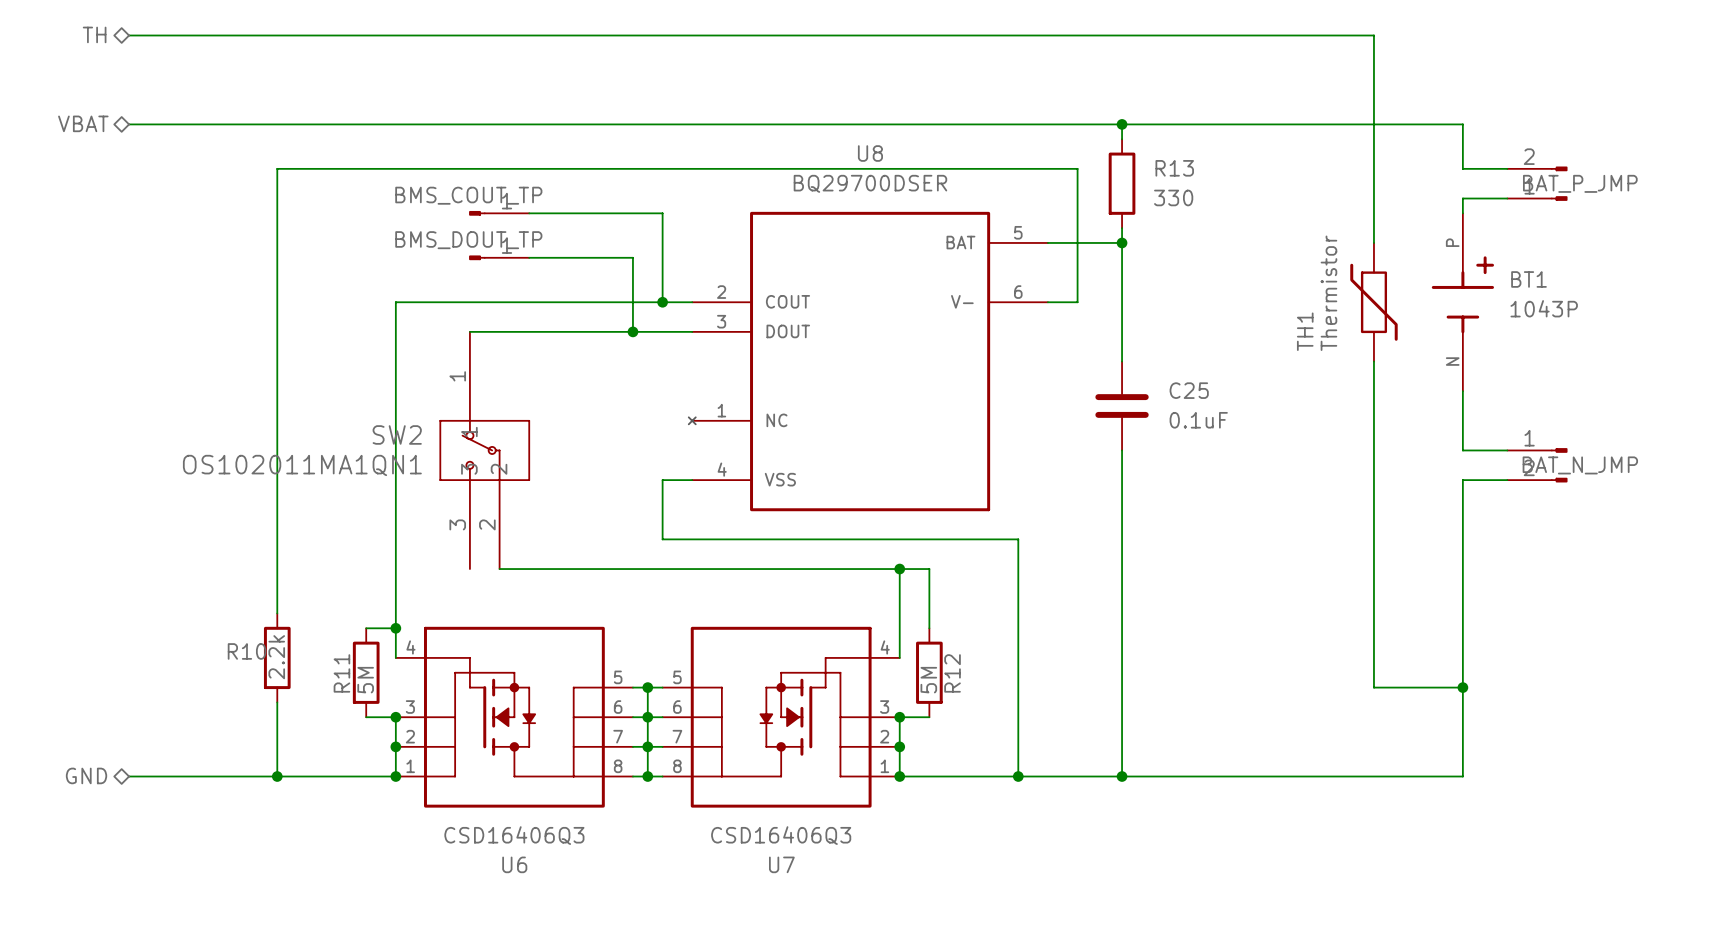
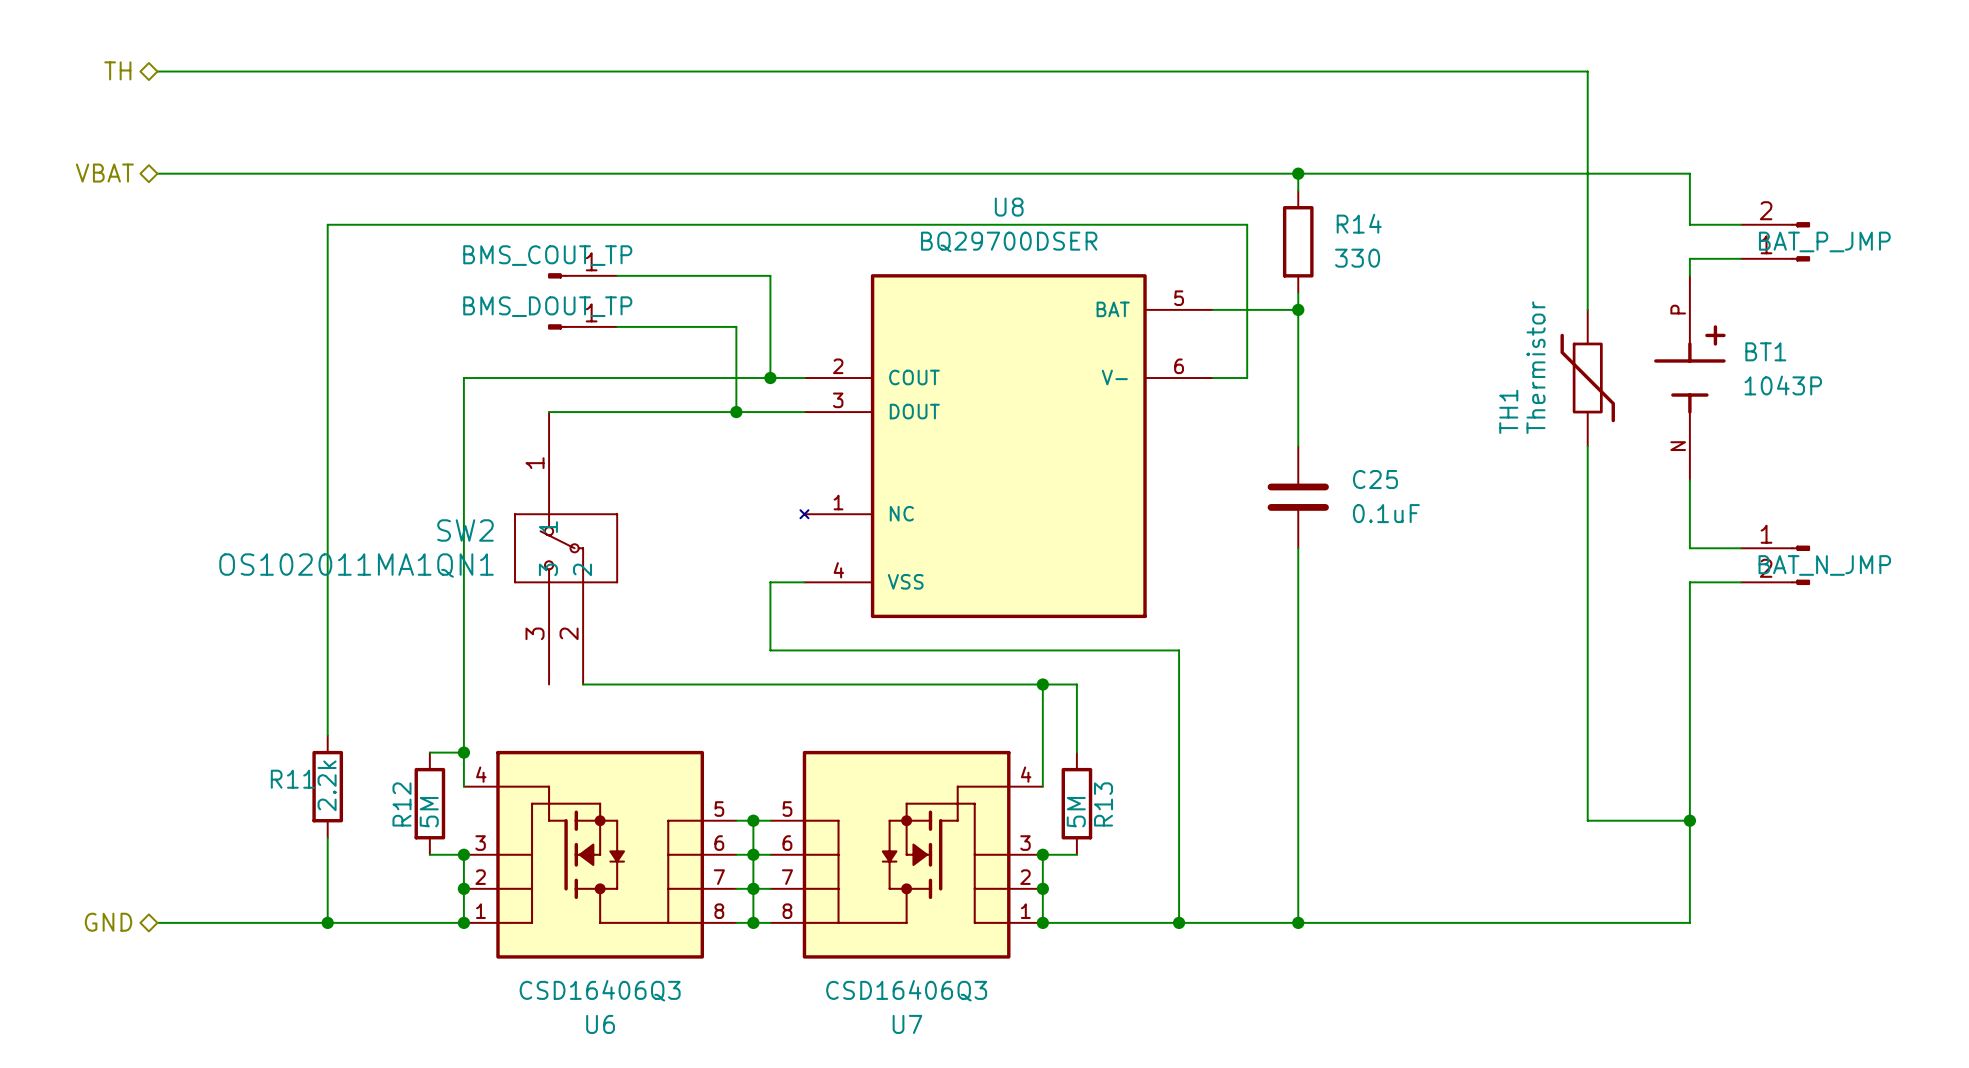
R13 name: R13 (1174, 168) -> R14 (1359, 223)
R10 name: R10 (246, 651) -> R11 (292, 779)
R11 name: R11 (341, 673) -> R12 (401, 804)
R12 name: R12 (952, 673) -> R13 (1103, 804)

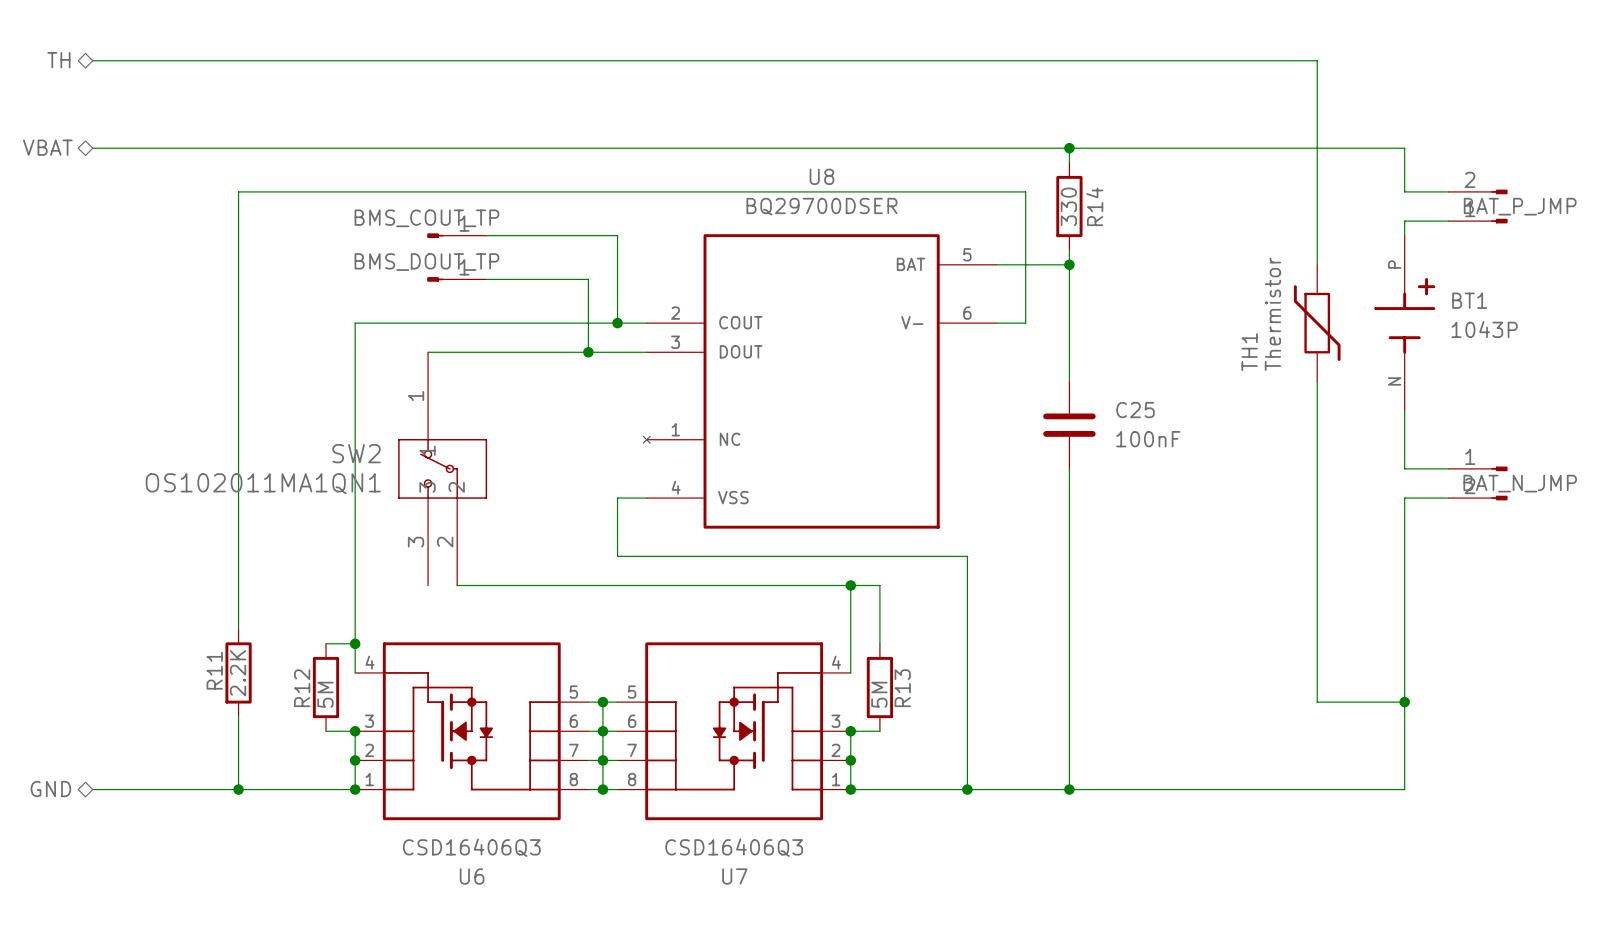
R14 name rotation: 0° (1359, 223) -> 90° counterclockwise (1094, 206)
R14 value rotation: 0° (1357, 258) -> 90° counterclockwise (1068, 206)
R14 value position: 330 (1357, 258) -> 330 (1068, 206)
C25 value: 0.1uF (1386, 513) -> 100nF (1148, 439)
R11 name rotation: 0° (292, 779) -> 90° counterclockwise (214, 670)
R11 value: 2.2k (327, 785) -> 2.2K (238, 673)

